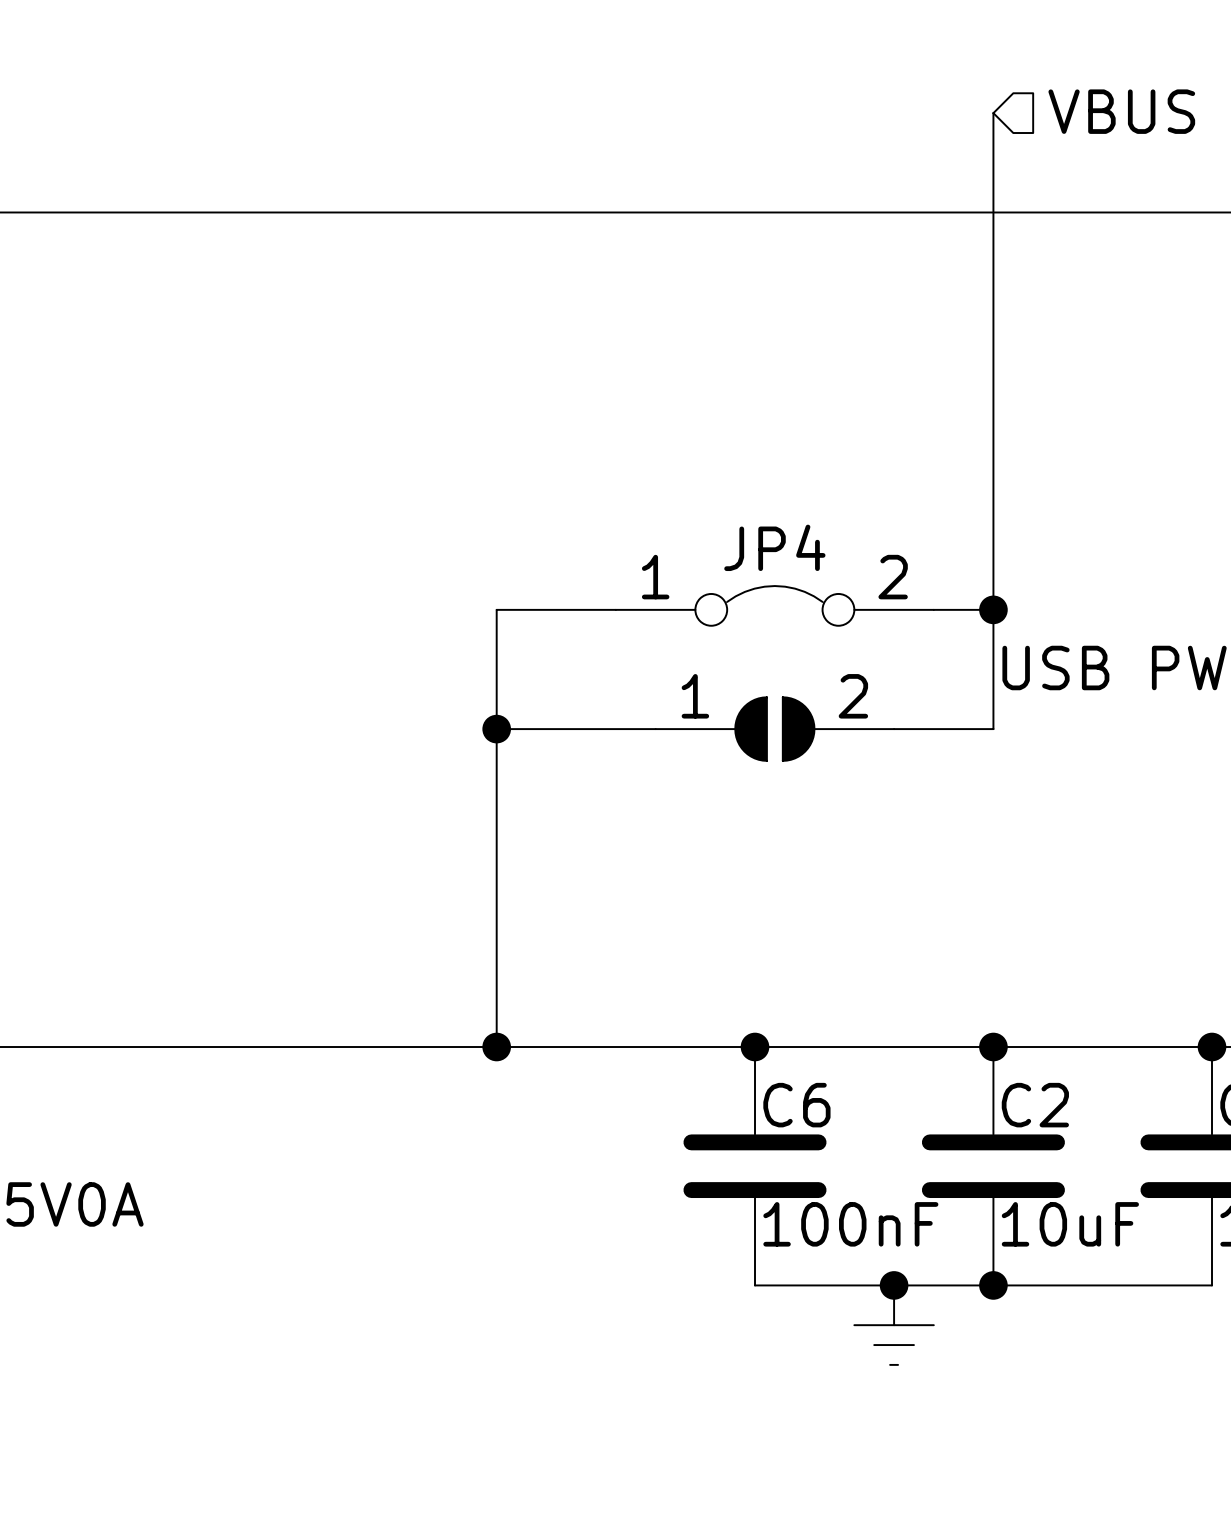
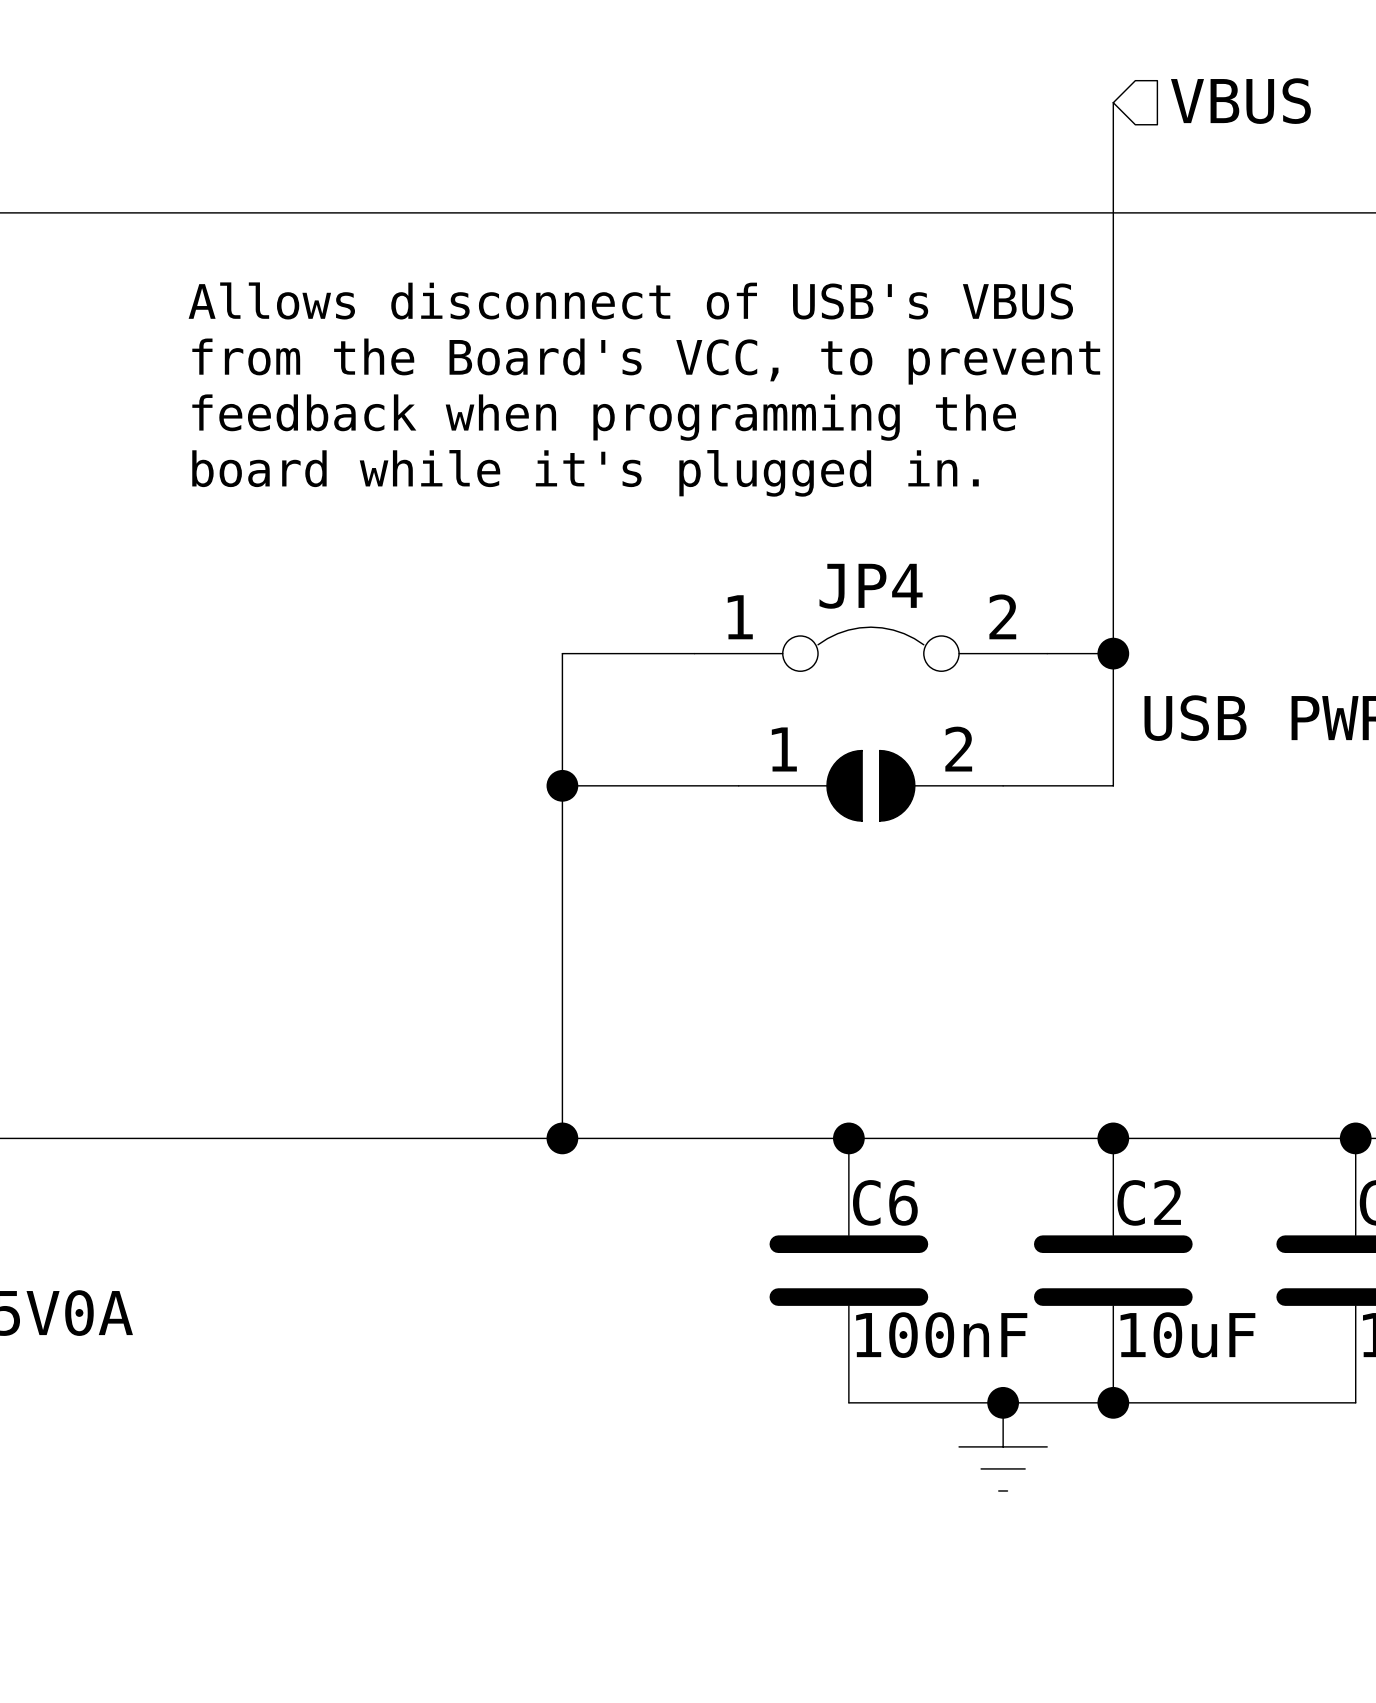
text: none -> Allows disconnect of USB's VBUS (630, 300)
text: none -> from the Board's VCC, to prevent (646, 361)
text: none -> feedback when programming the (604, 417)
text: none -> board while it's plugged in. (585, 473)

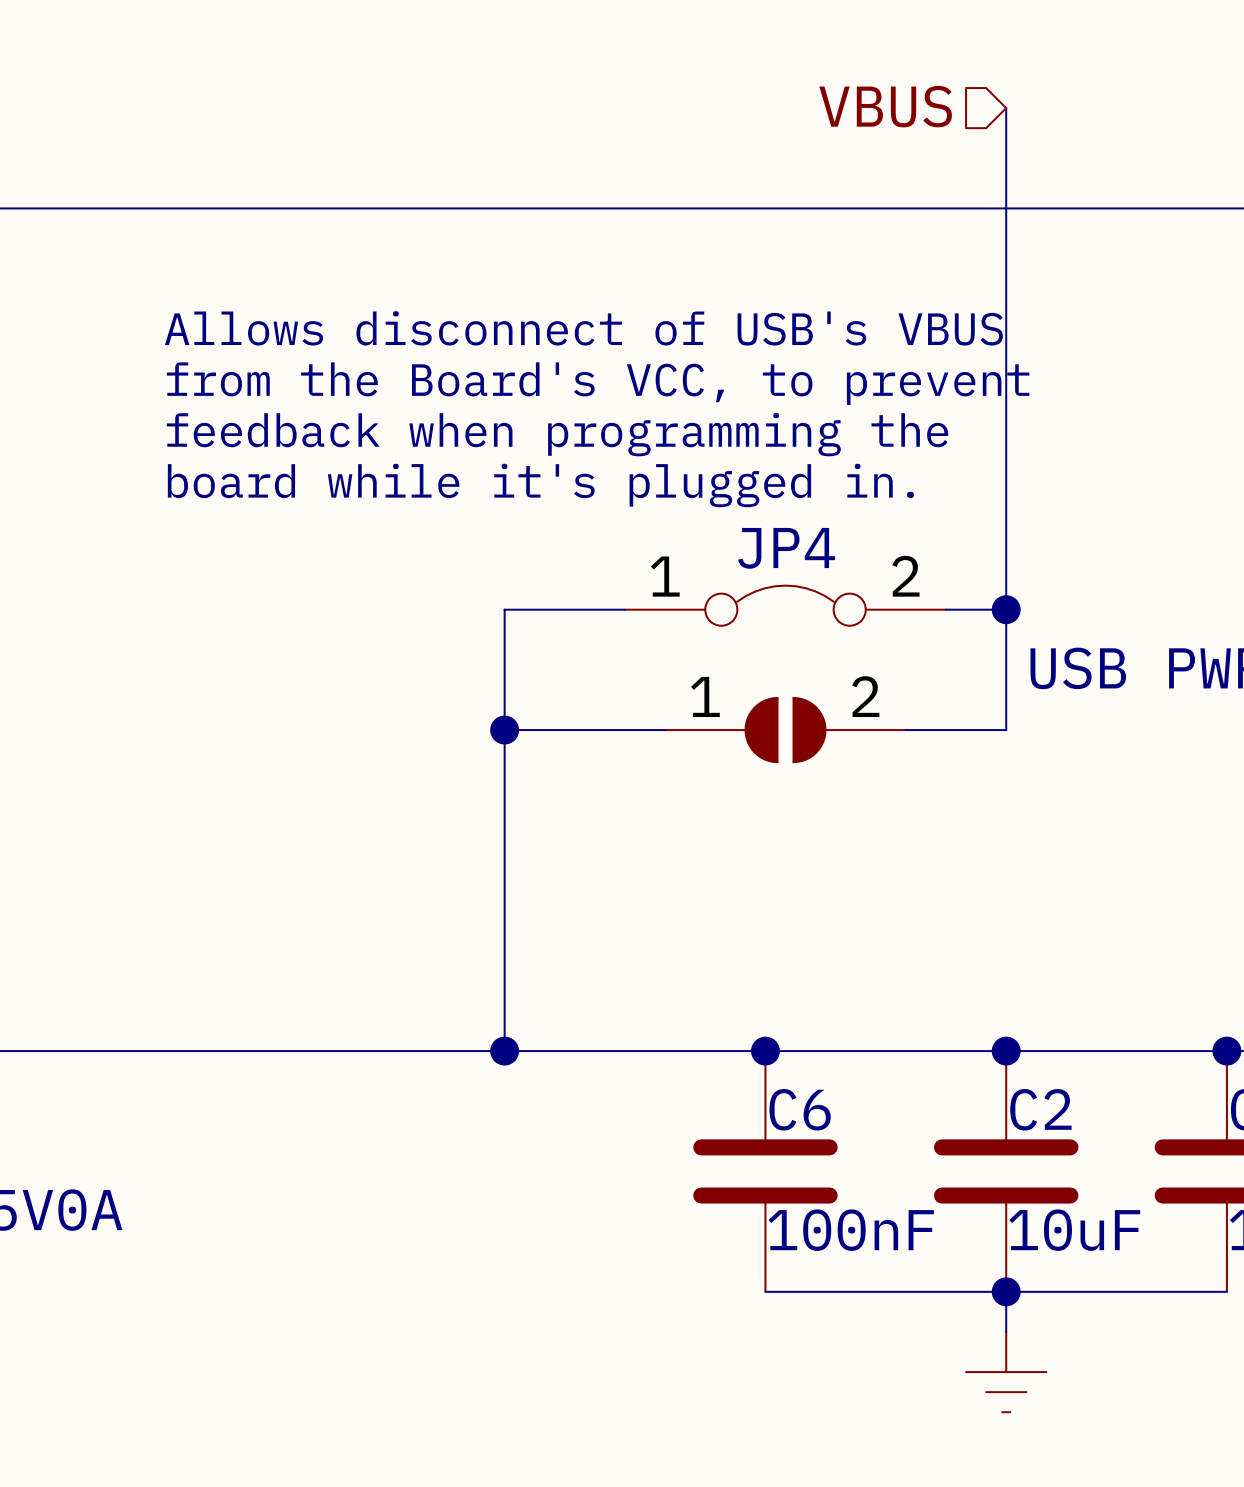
hierarchical label rotation: 0° (1240, 101) -> 180° (885, 106)
hierarchical label position: VBUS (1240, 101) -> VBUS (885, 106)
text: Allows disconnect of USB's VBUS (630, 300) -> none
text: from the Board's VCC, to prevent (646, 361) -> Allows disconnect of USB's VBUS (583, 328)
text: feedback when programming the (604, 417) -> from the Board's VCC, to prevent (598, 383)
text: board while it's plugged in. (585, 473) -> feedback when programming the (557, 434)
text: none -> board while it's plugged in. (540, 485)
junction: (1003, 1402) -> none
wire: none -> (1006, 1291) (1006, 1331)
power symbol position: (1003, 1446) -> (1006, 1372)

